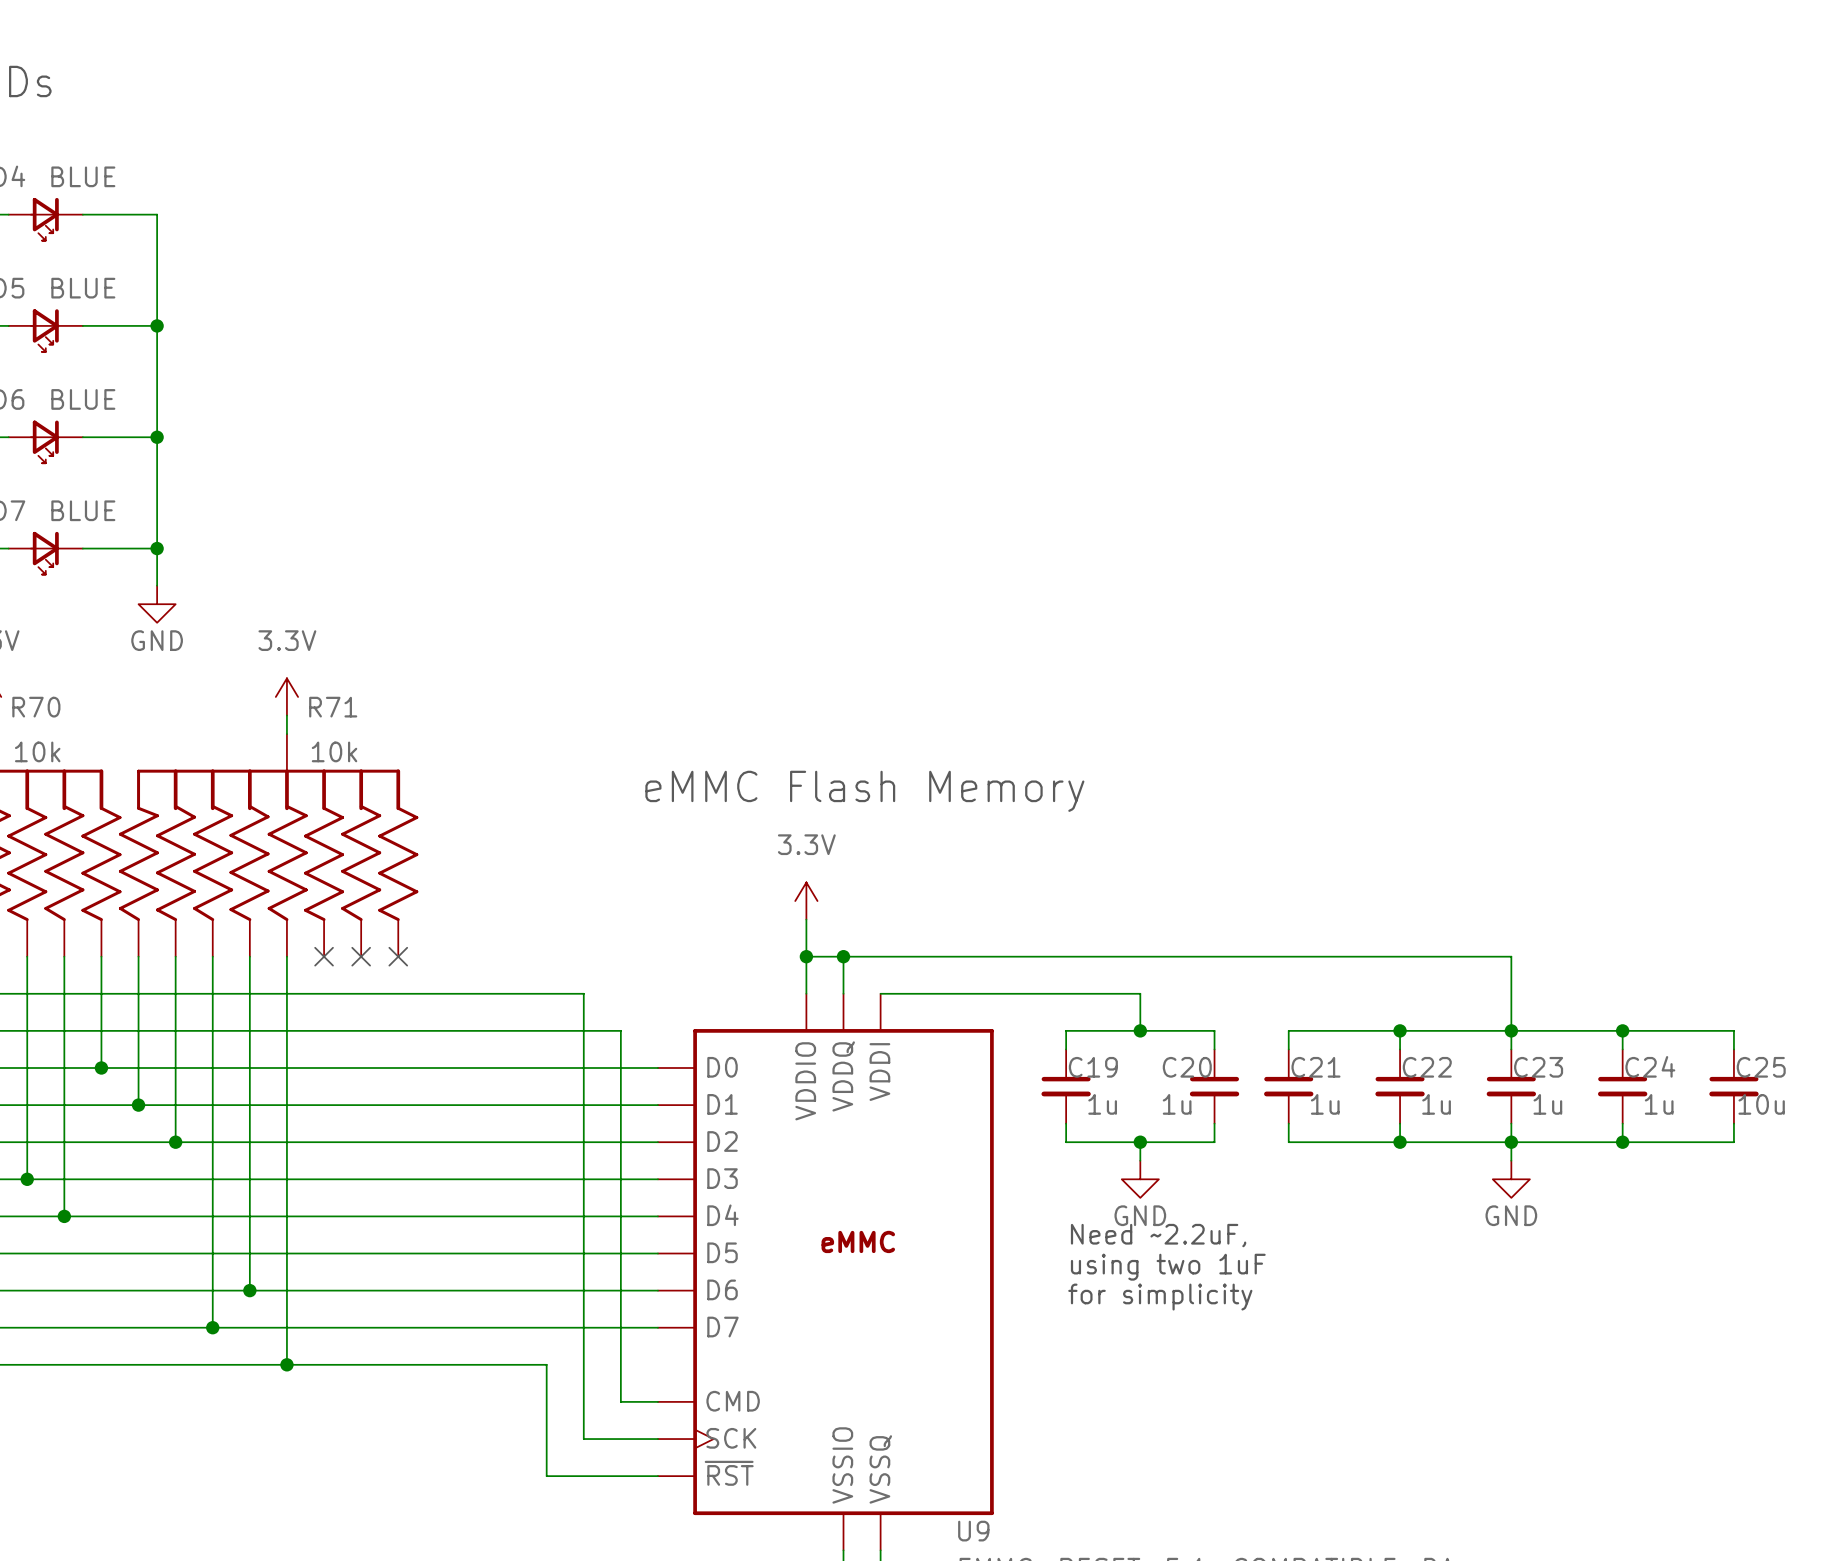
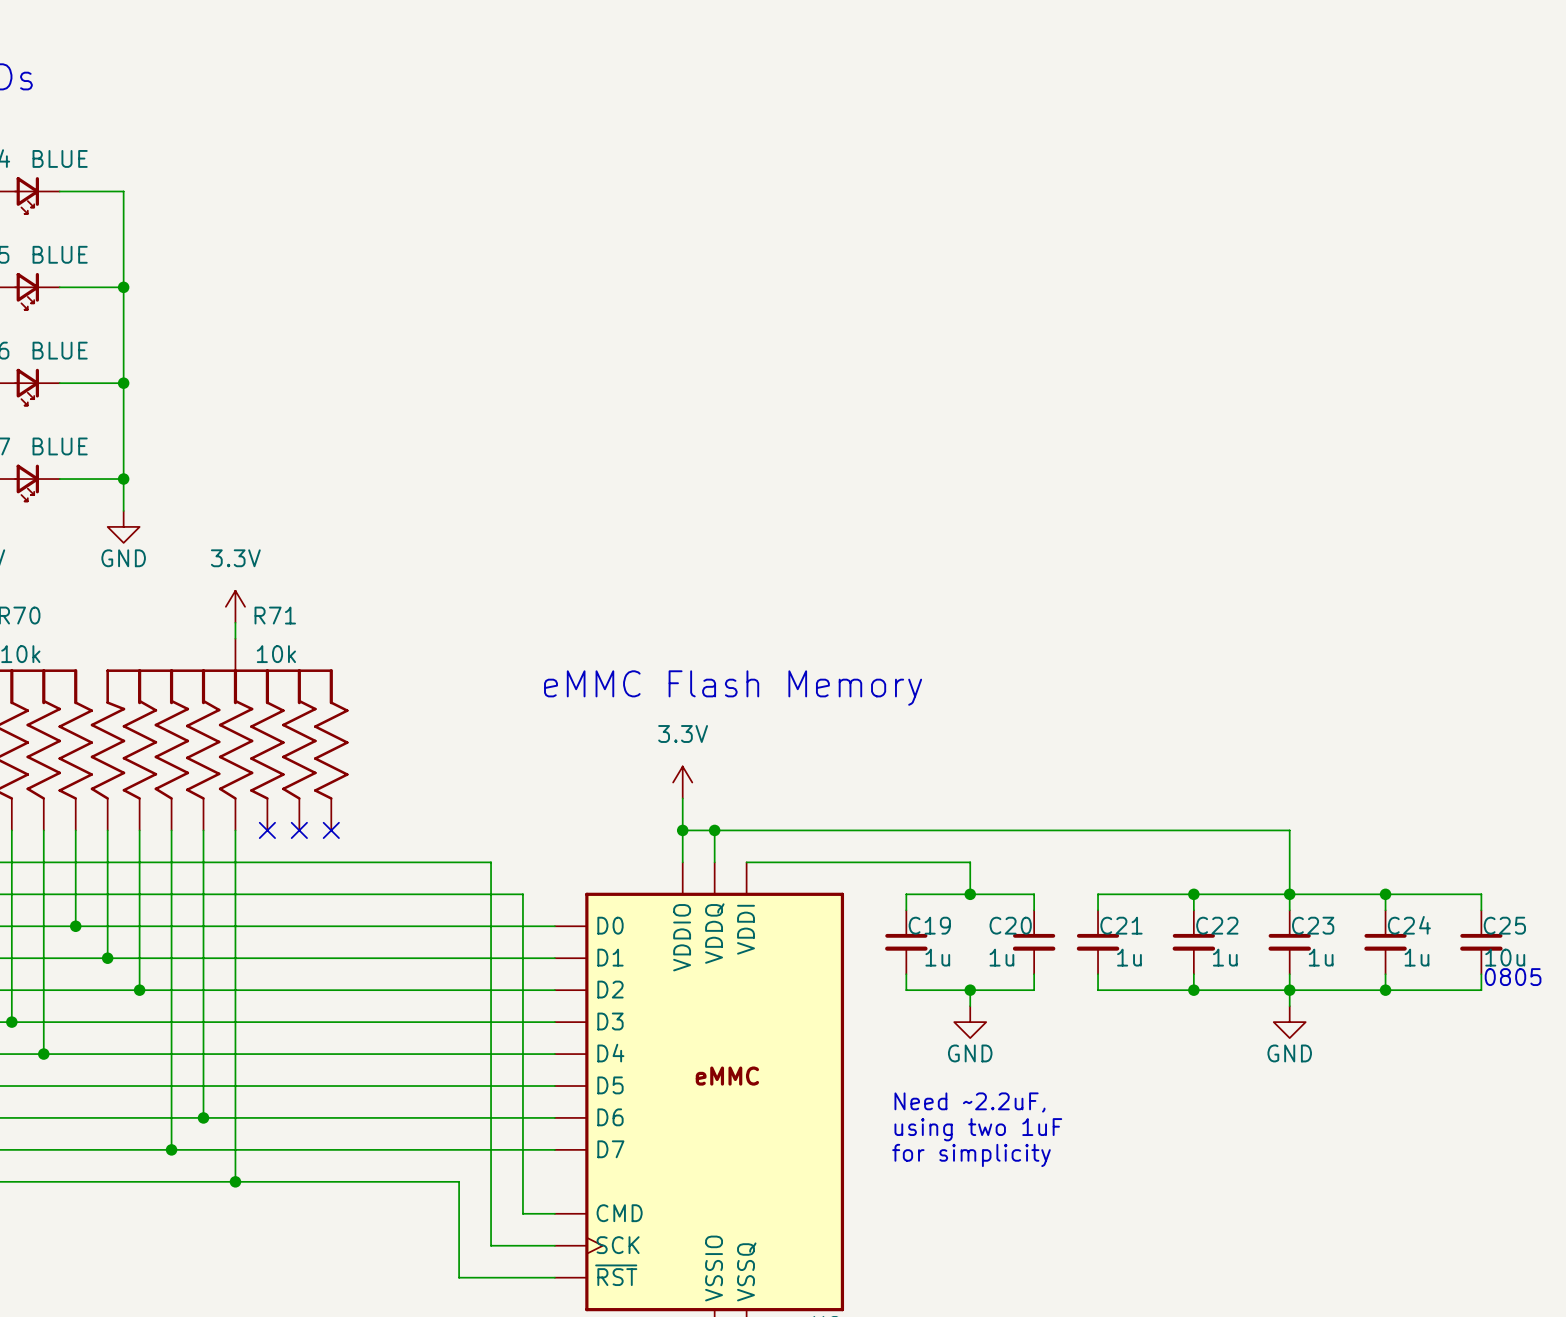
text: none -> 0805 (1513, 977)
text position: Need ~2.2uF, (1158, 1235) -> Need ~2.2uF, (969, 1102)
text position: using two 1uF (1168, 1267) -> using two 1uF (978, 1129)
text position: for simplicity (1160, 1297) -> for simplicity (971, 1155)

